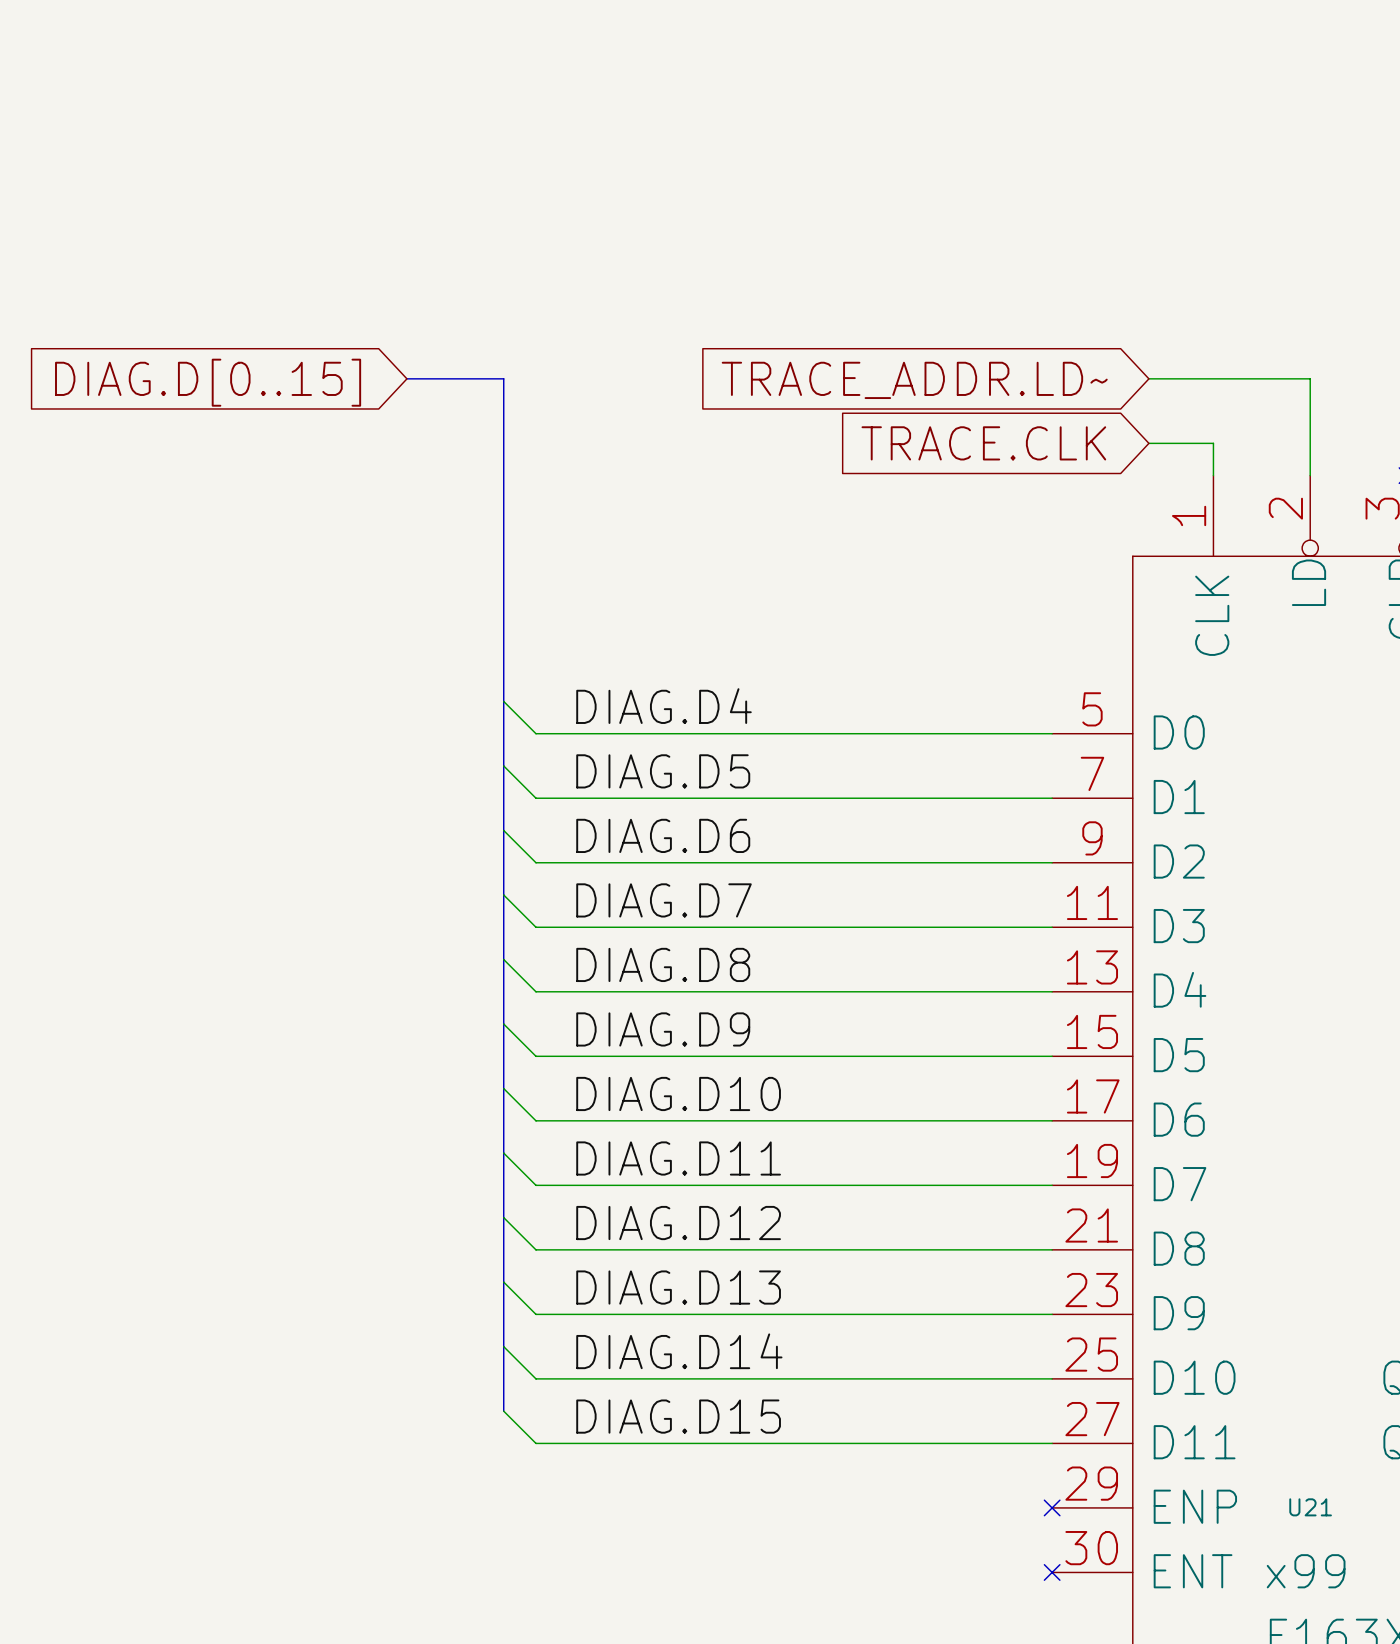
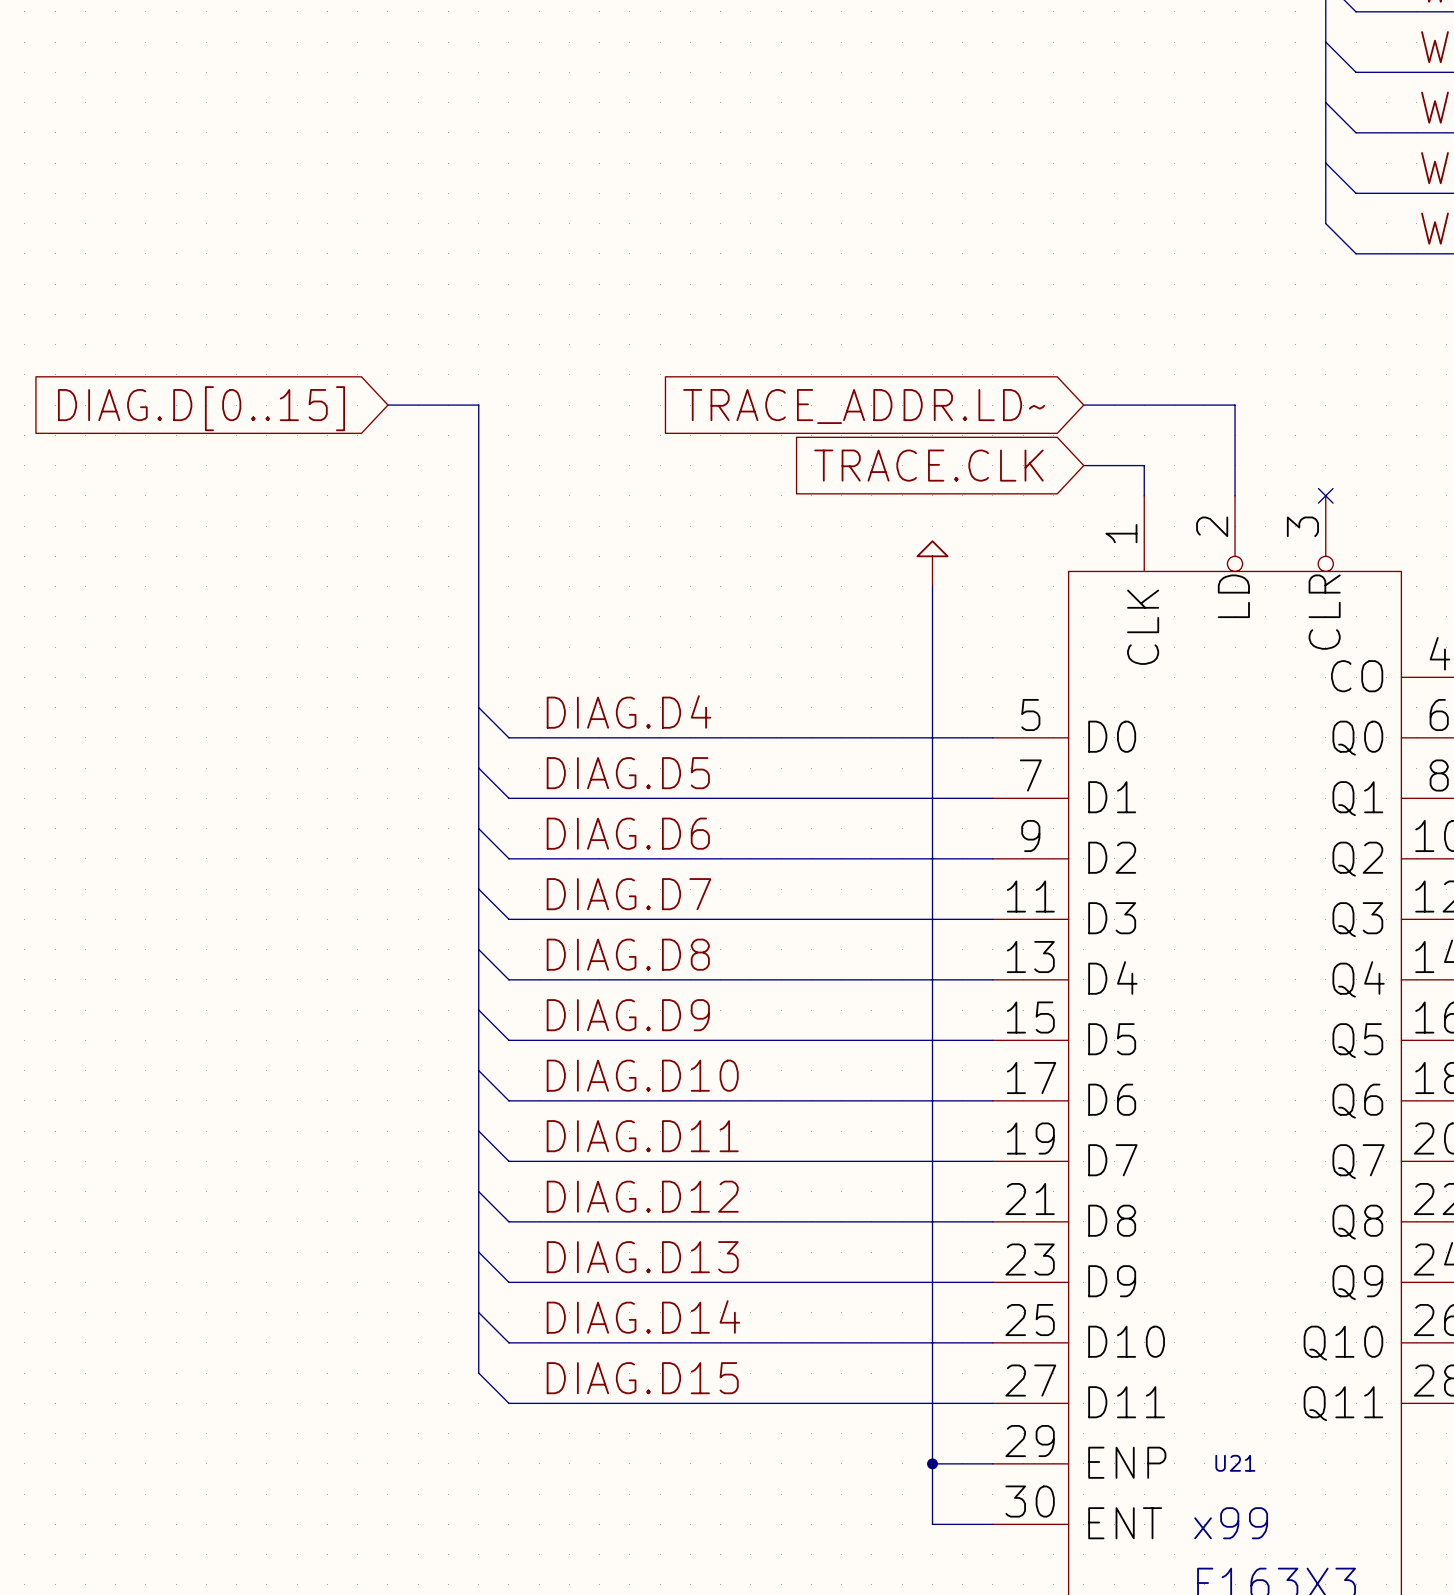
power symbol: none -> (932, 563)
wire: none -> (932, 586) (932, 1524) (992, 1524)
wire: none -> (932, 1463) (992, 1463)
junction: none -> (932, 1463)
no-connect mark: (1052, 1507) -> none
no-connect mark: (1052, 1572) -> none

